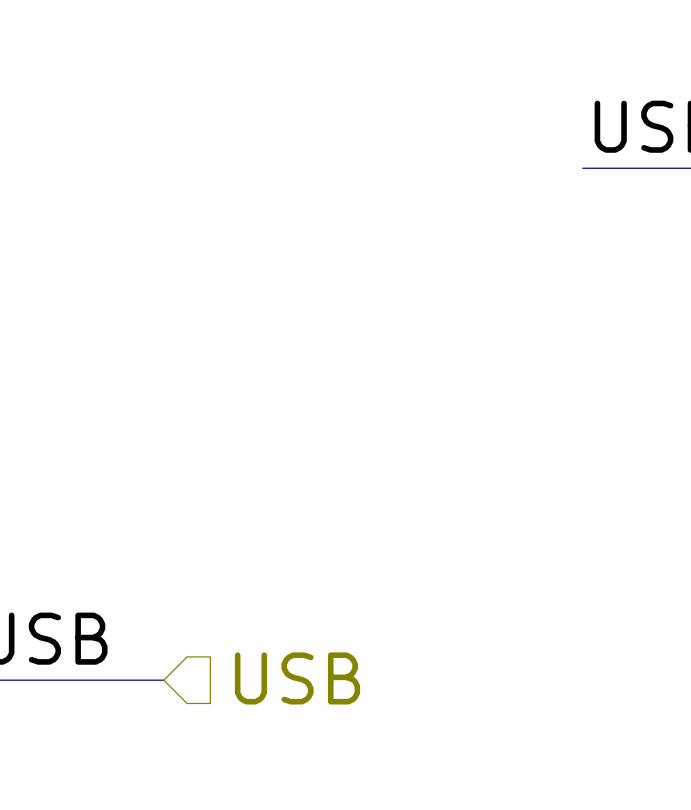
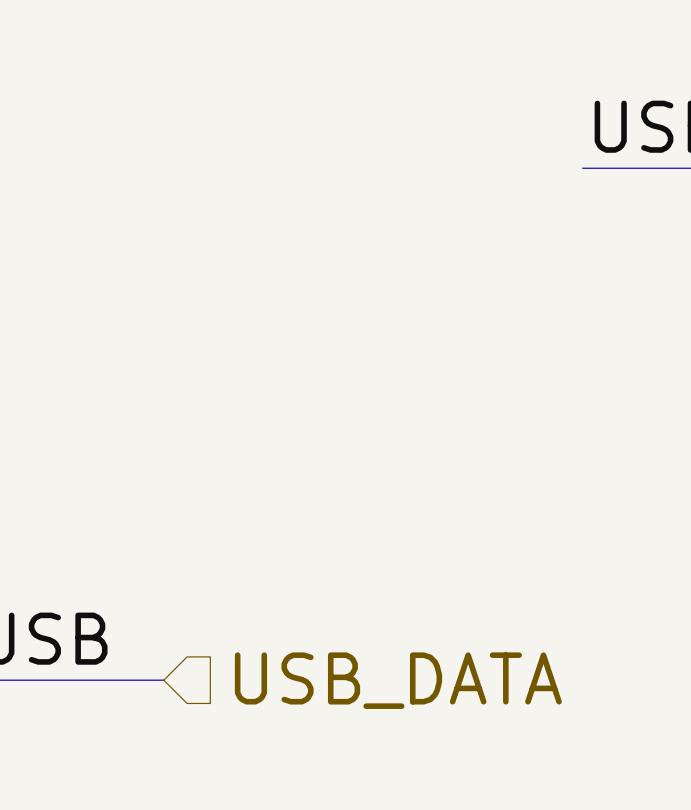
hierarchical label: USB (297, 678) -> USB_DATA (398, 680)

